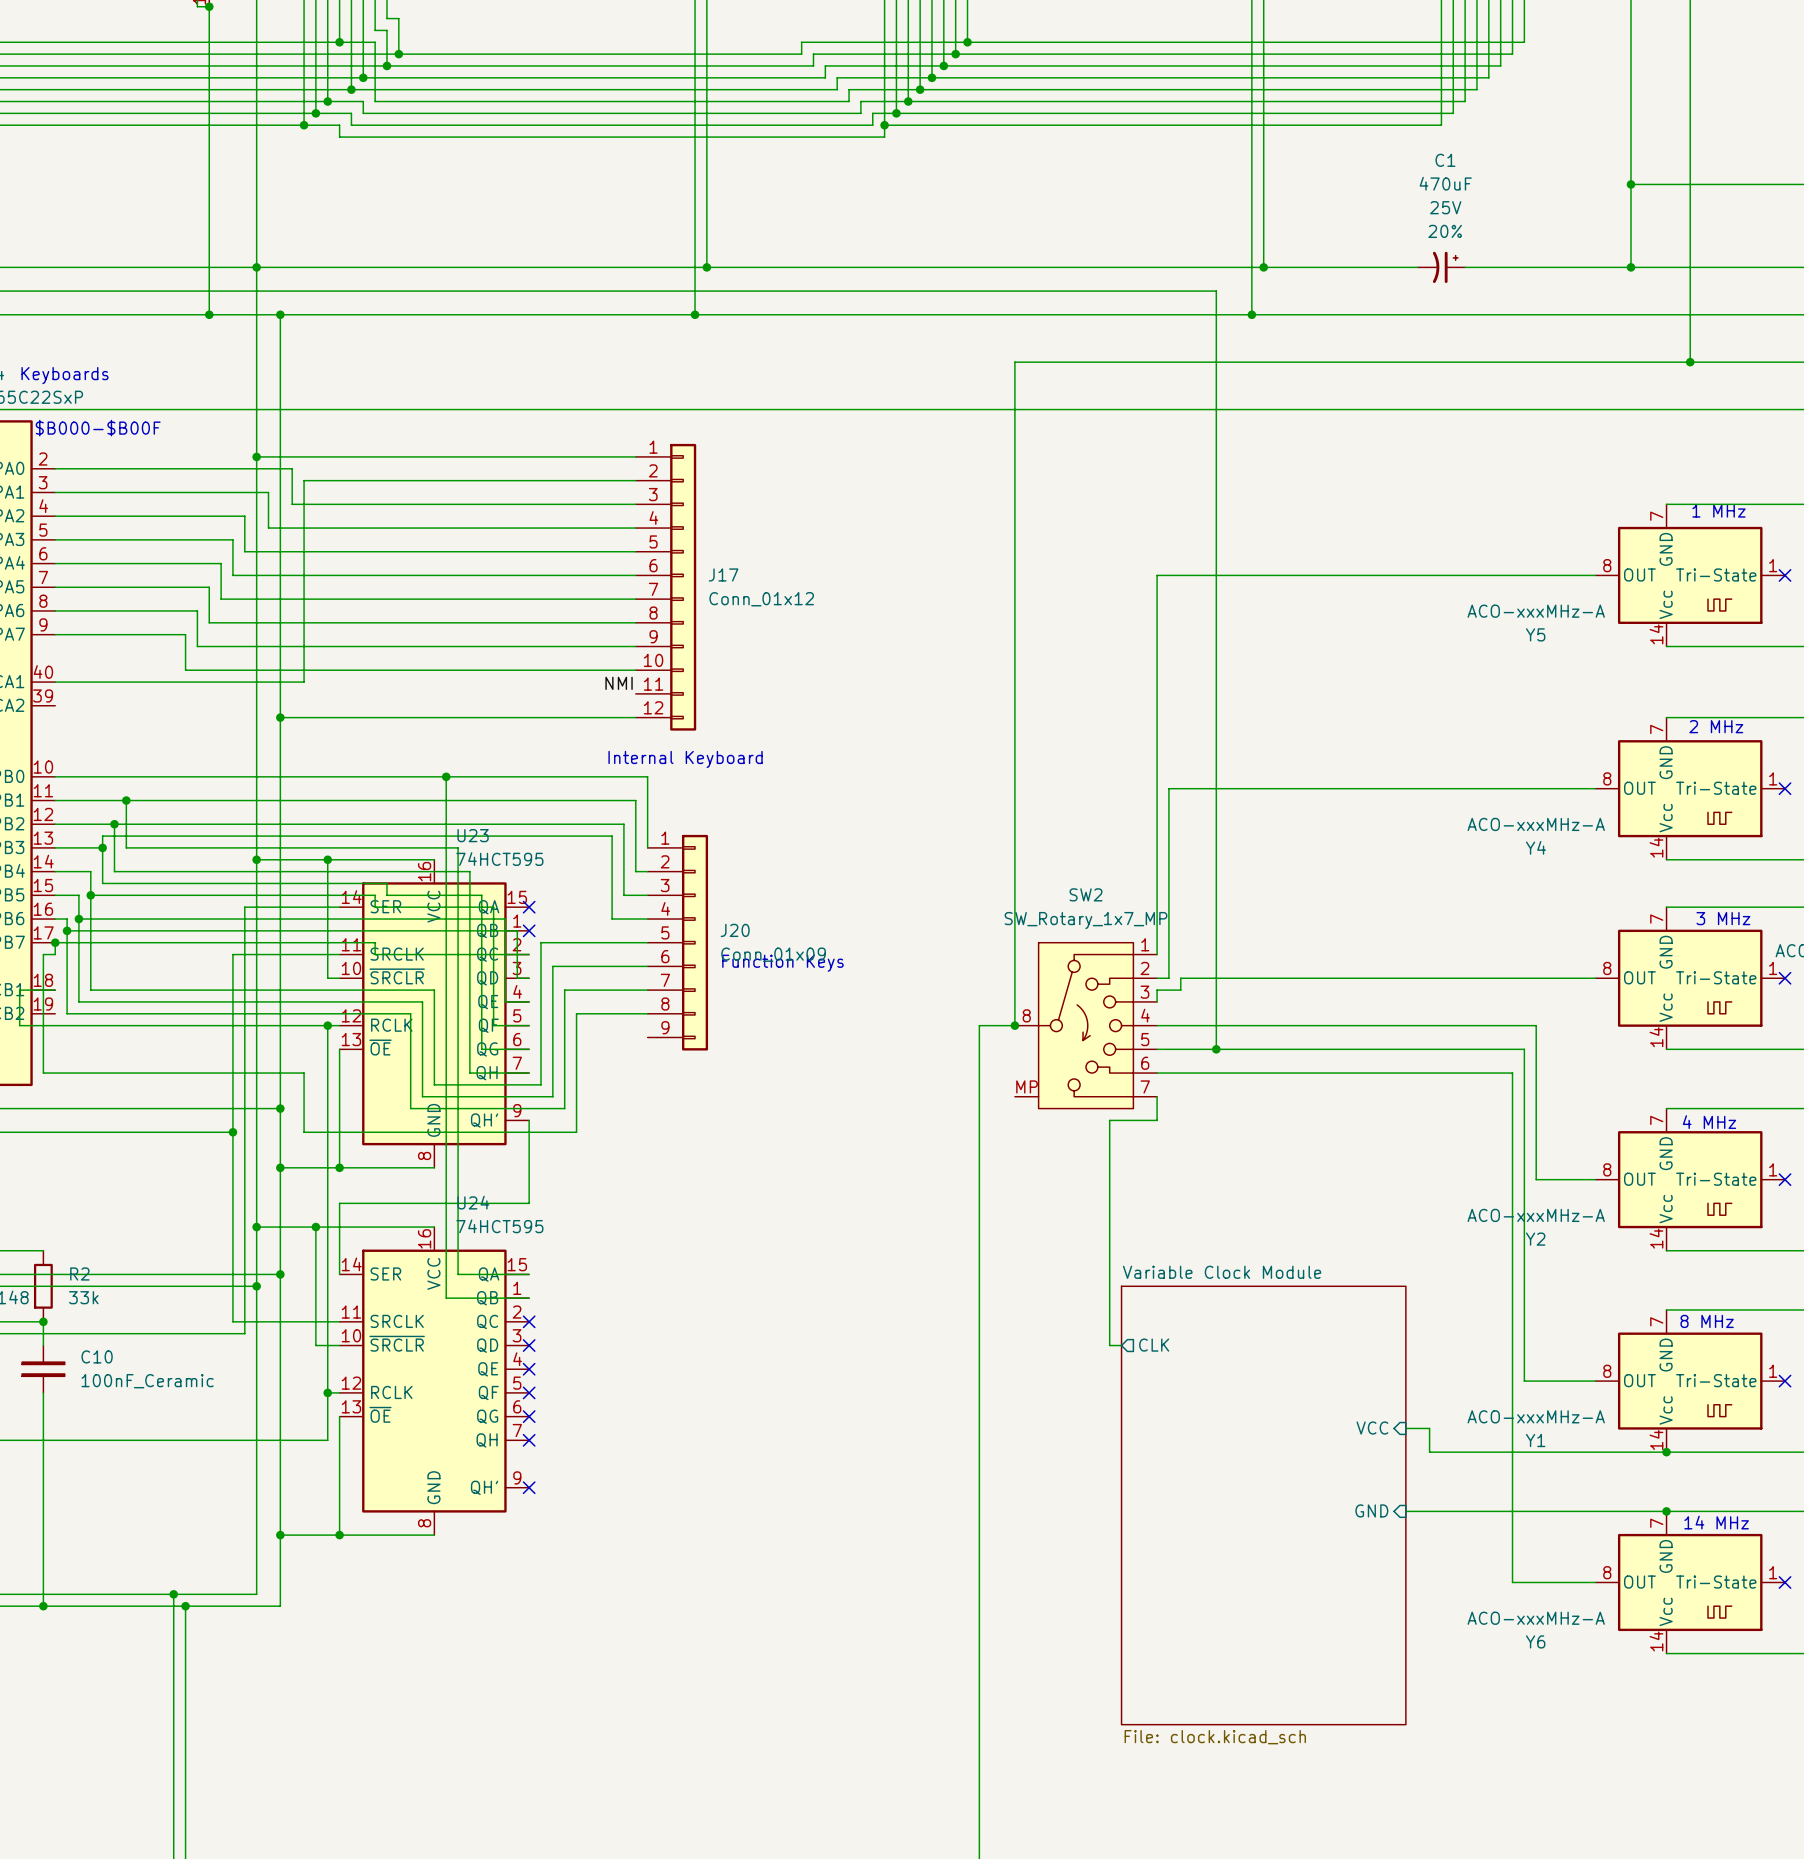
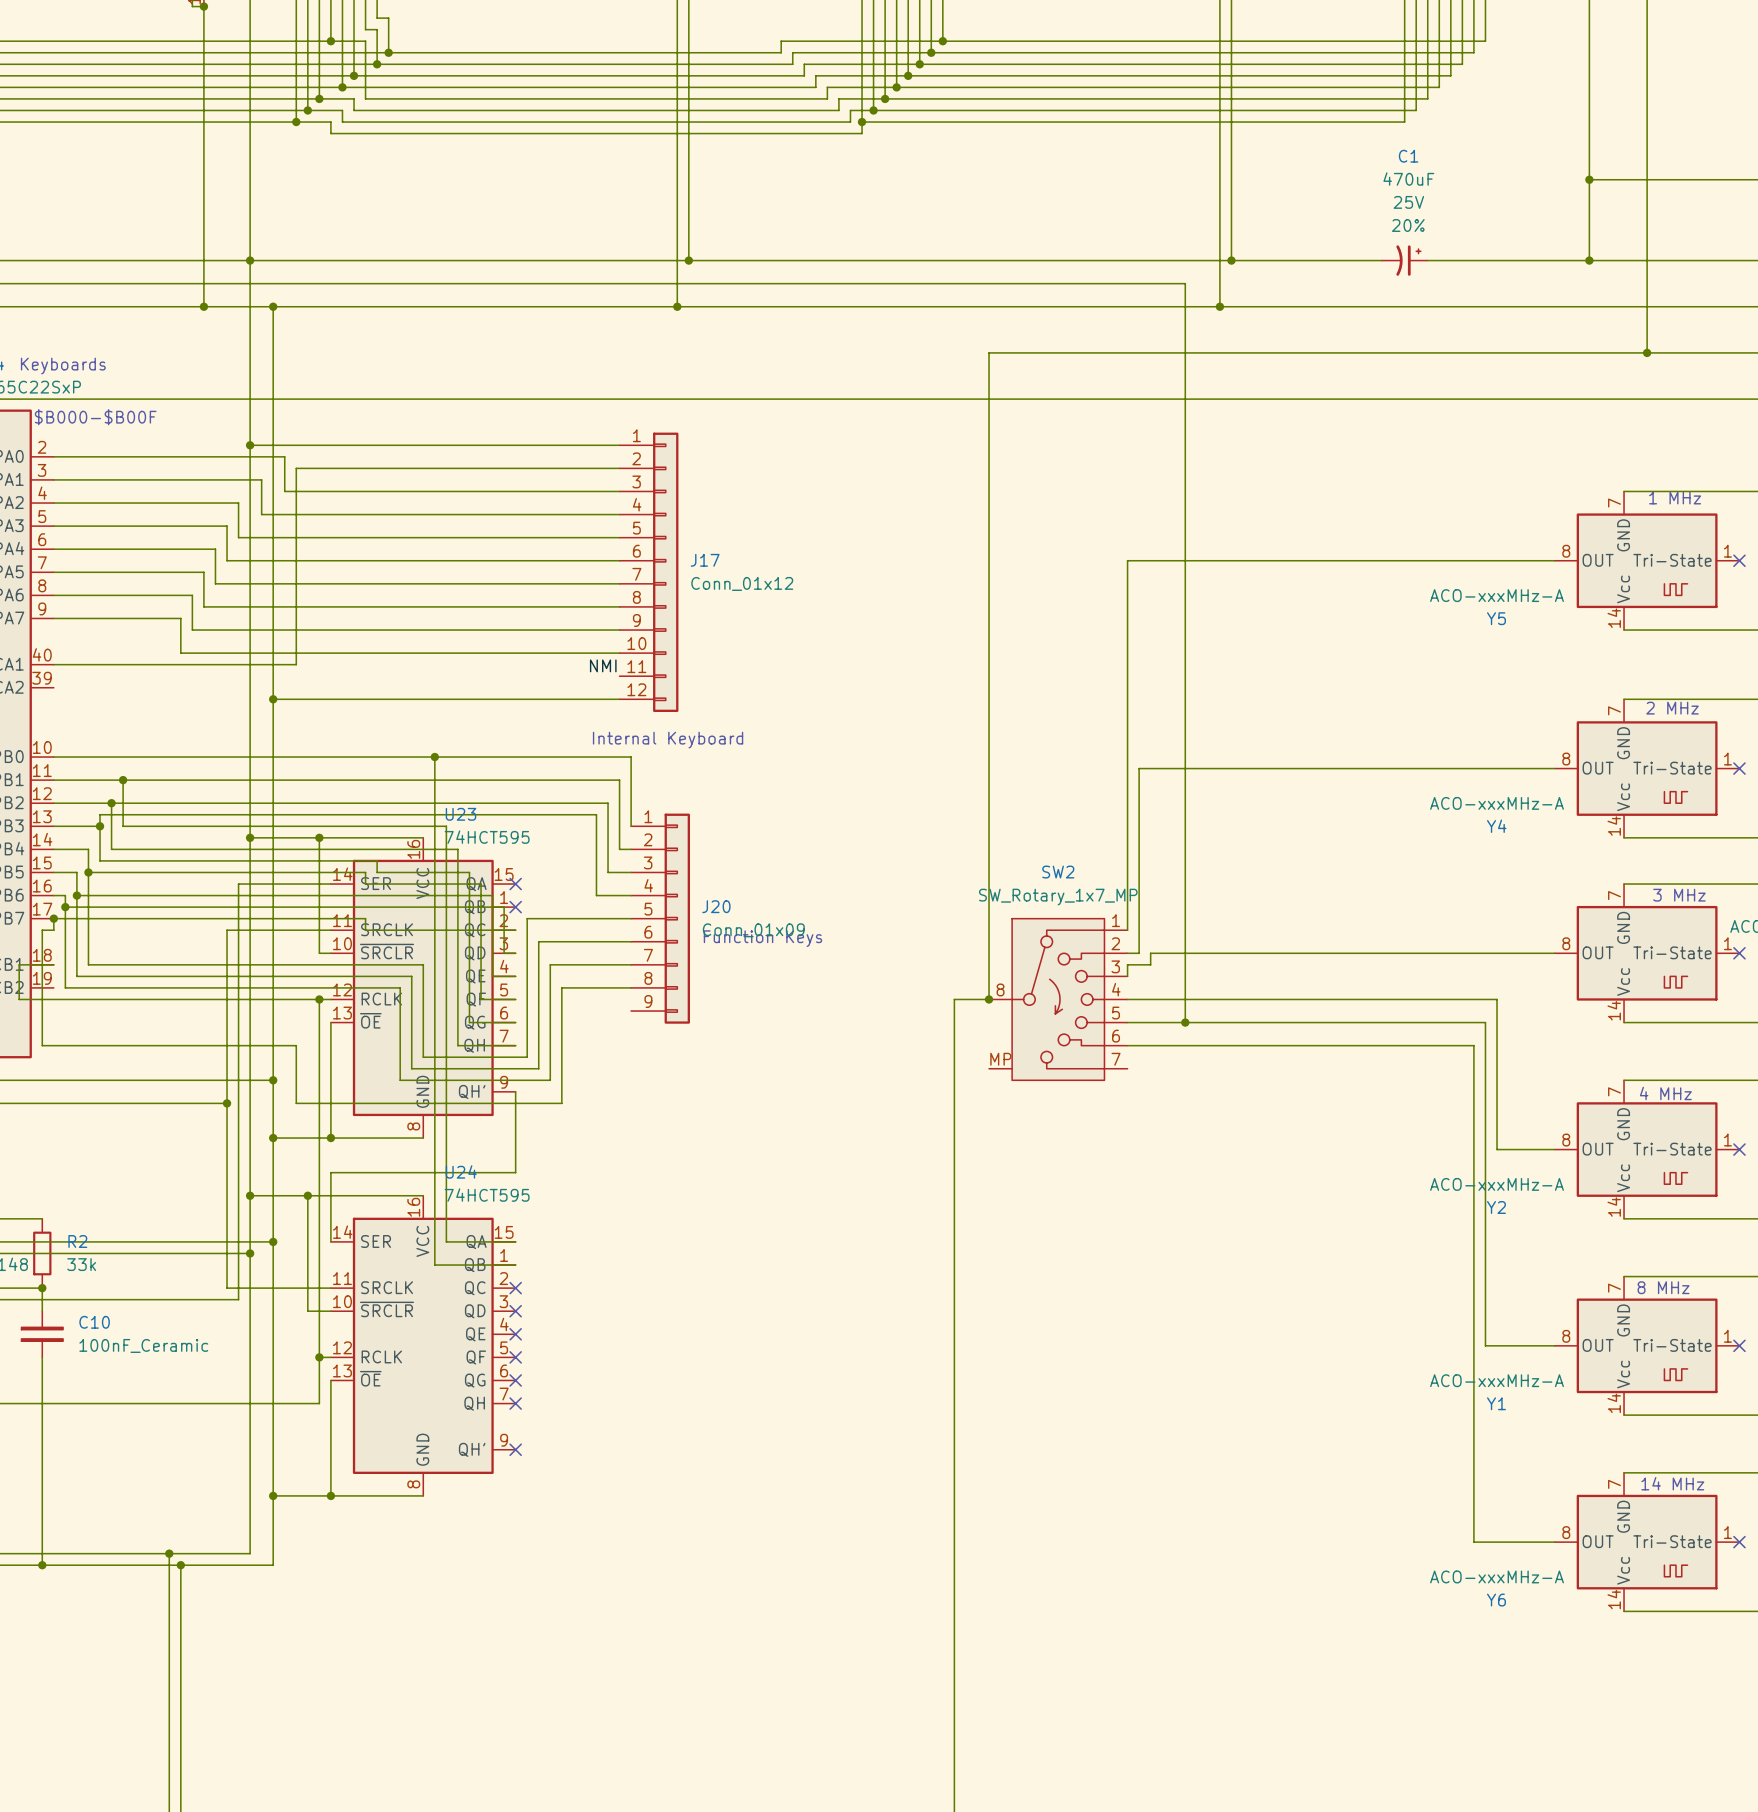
wire: (1157, 1096) (1157, 1120) (1109, 1120) (1109, 1345) (1121, 1345) -> none
sheet pin: CLK (1154, 1345) -> none
sheet pin: VCC (1372, 1428) -> none
wire: (1405, 1428) (1429, 1428) (1429, 1452) (1666, 1452) -> none
junction: (1666, 1452) -> none
sheet Variable Clock Module: File: clock.kicad_sch (1263, 1505) -> none
sheet pin: GND (1371, 1510) -> none
wire: (1405, 1511) (1666, 1511) -> none
junction: (1666, 1511) -> none

